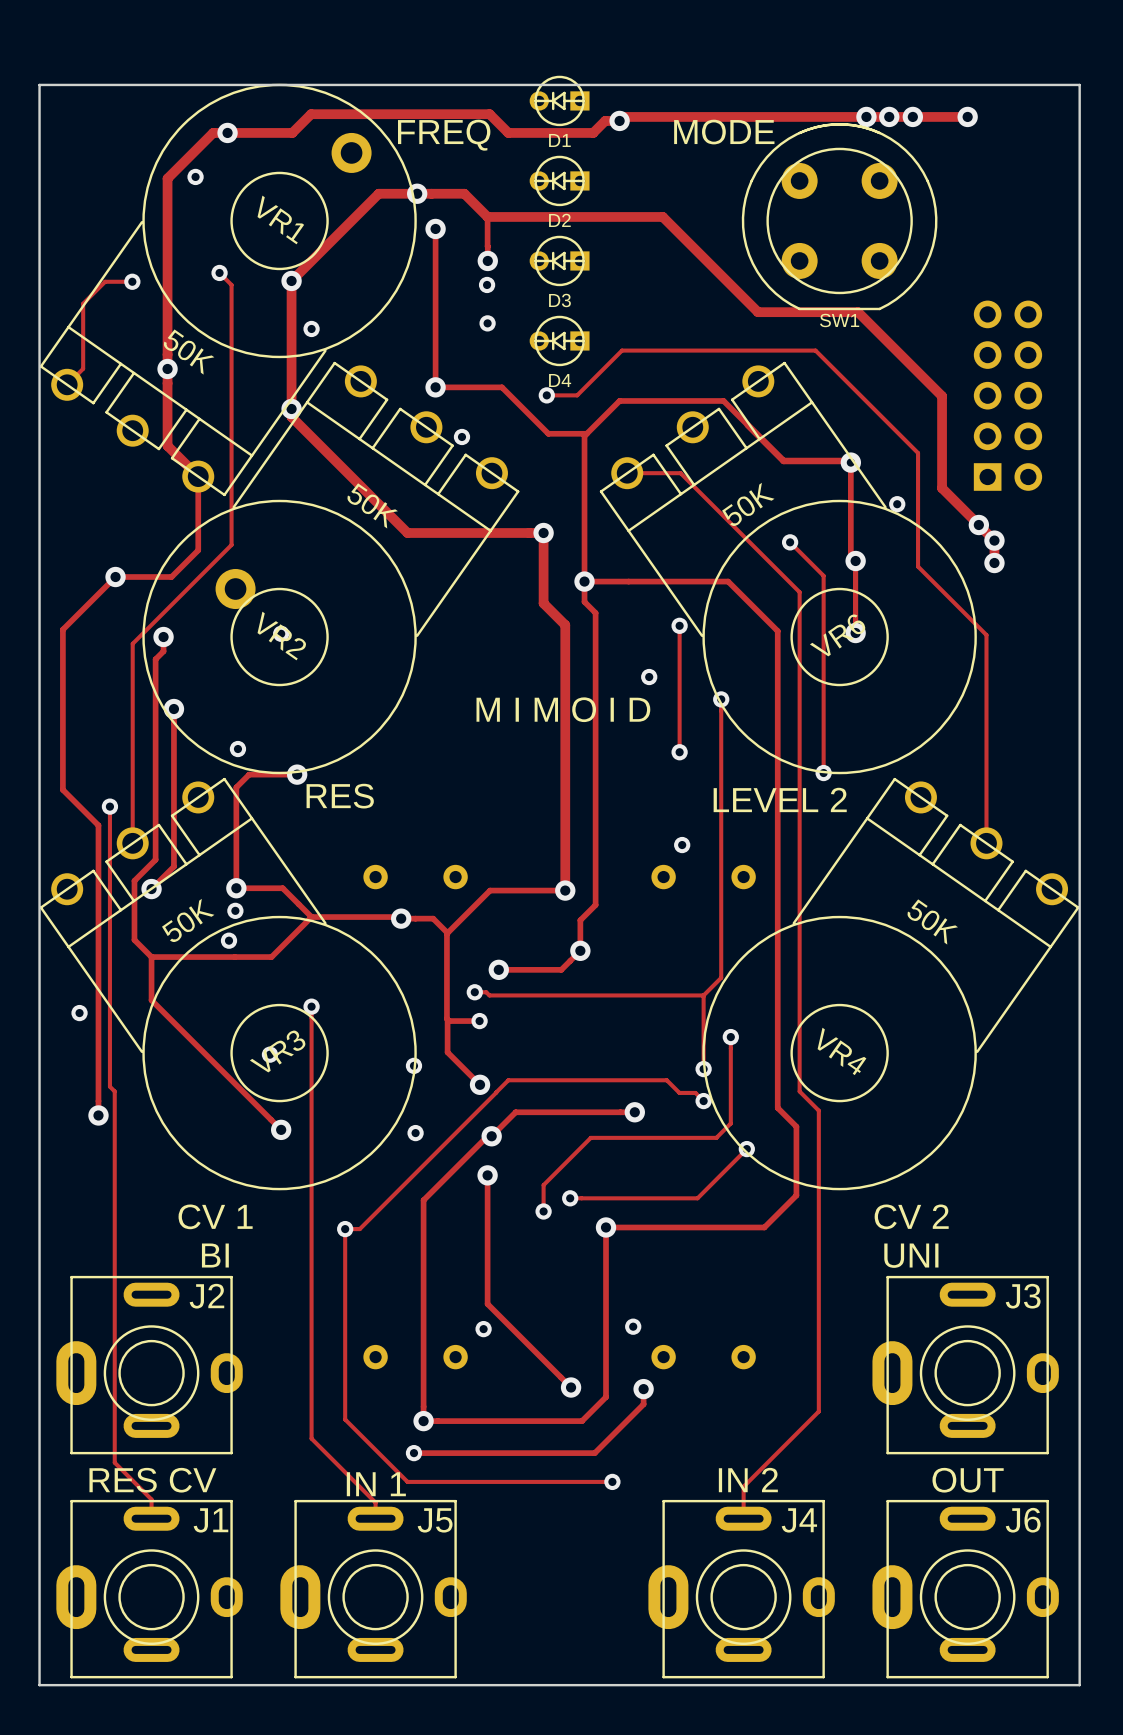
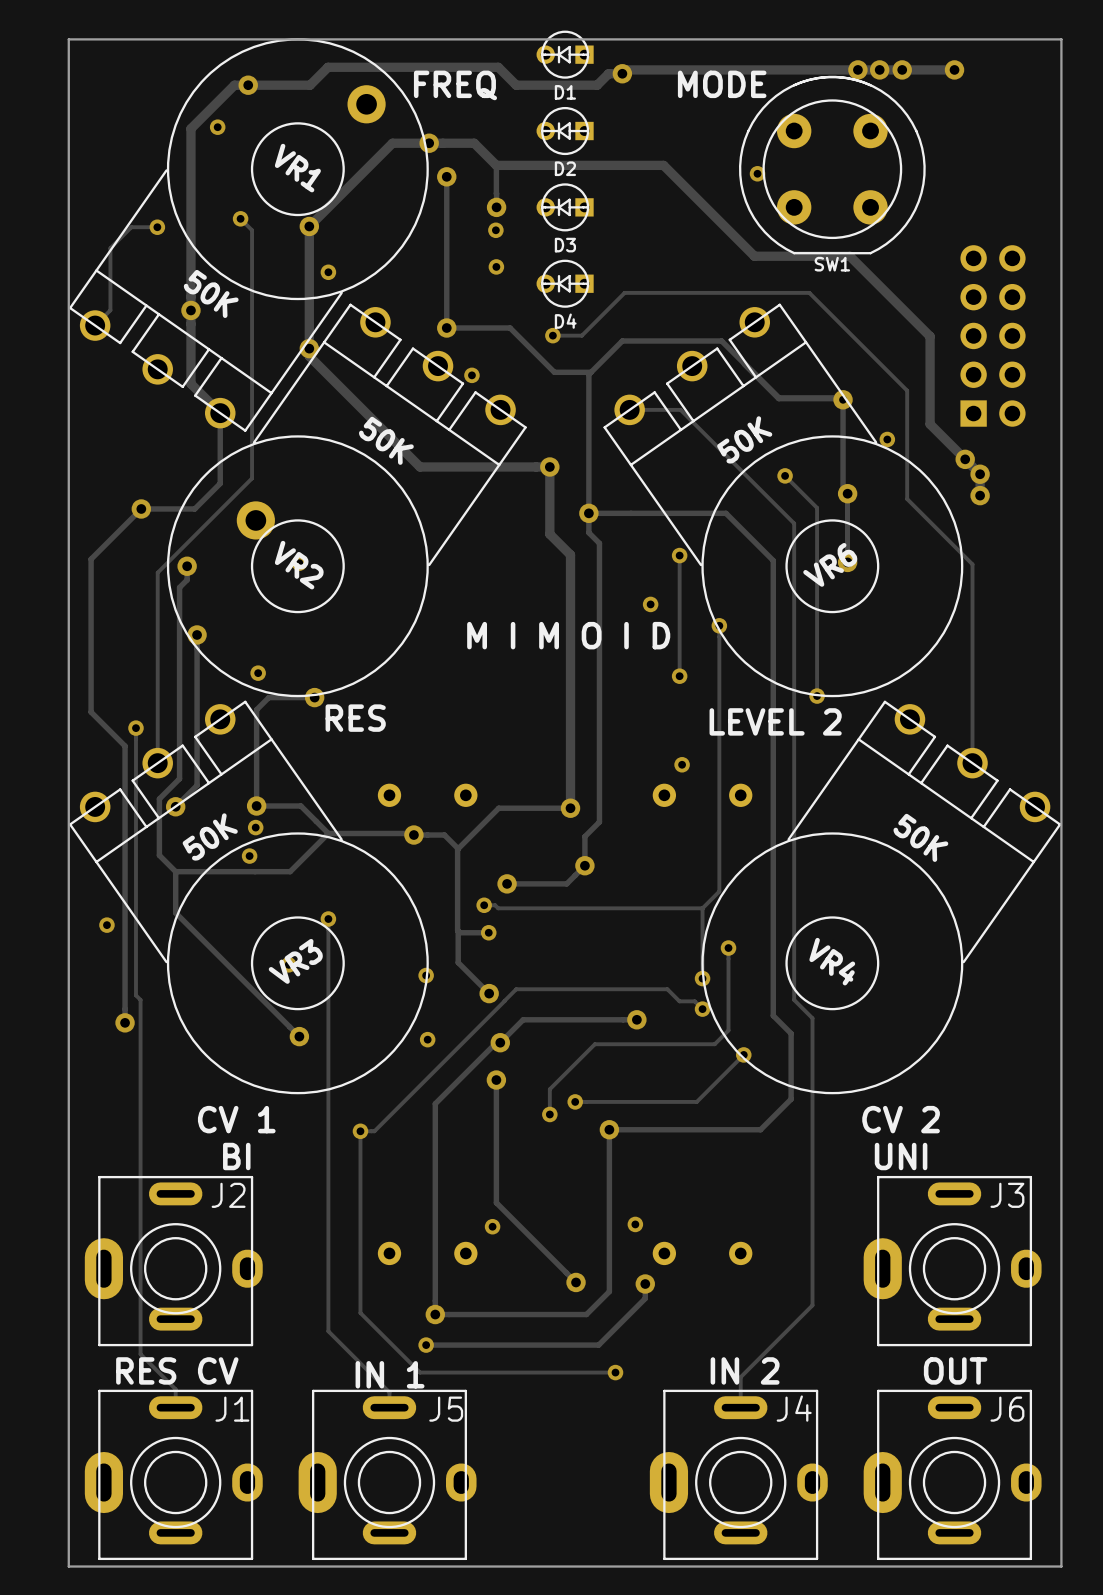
via: none -> (757, 173)

